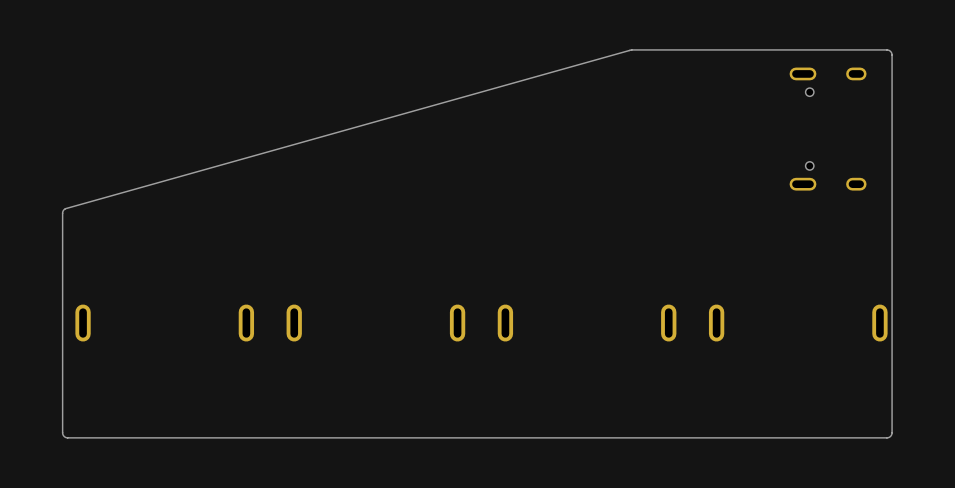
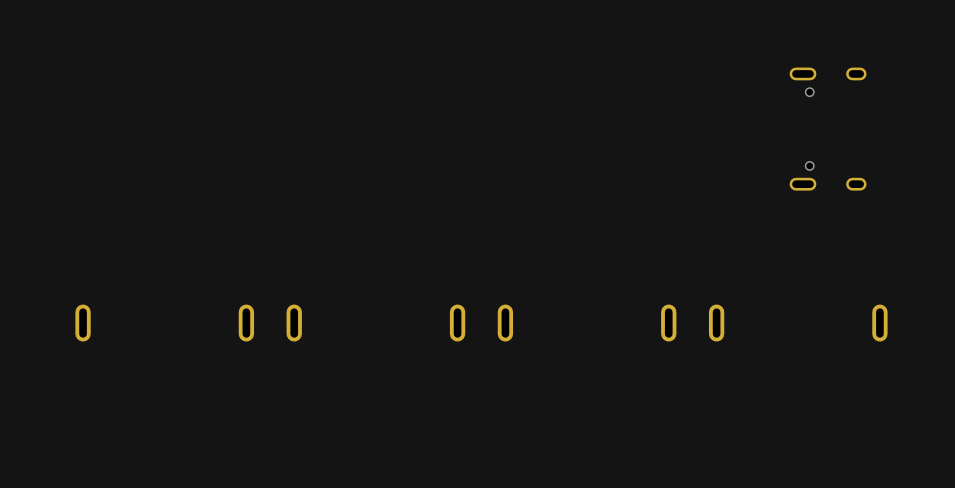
board edge: (886, 49) (630, 50) (65, 208) (62, 213) (63, 434) (67, 437) (889, 437) (892, 432) (892, 55) (886, 49) -> none

